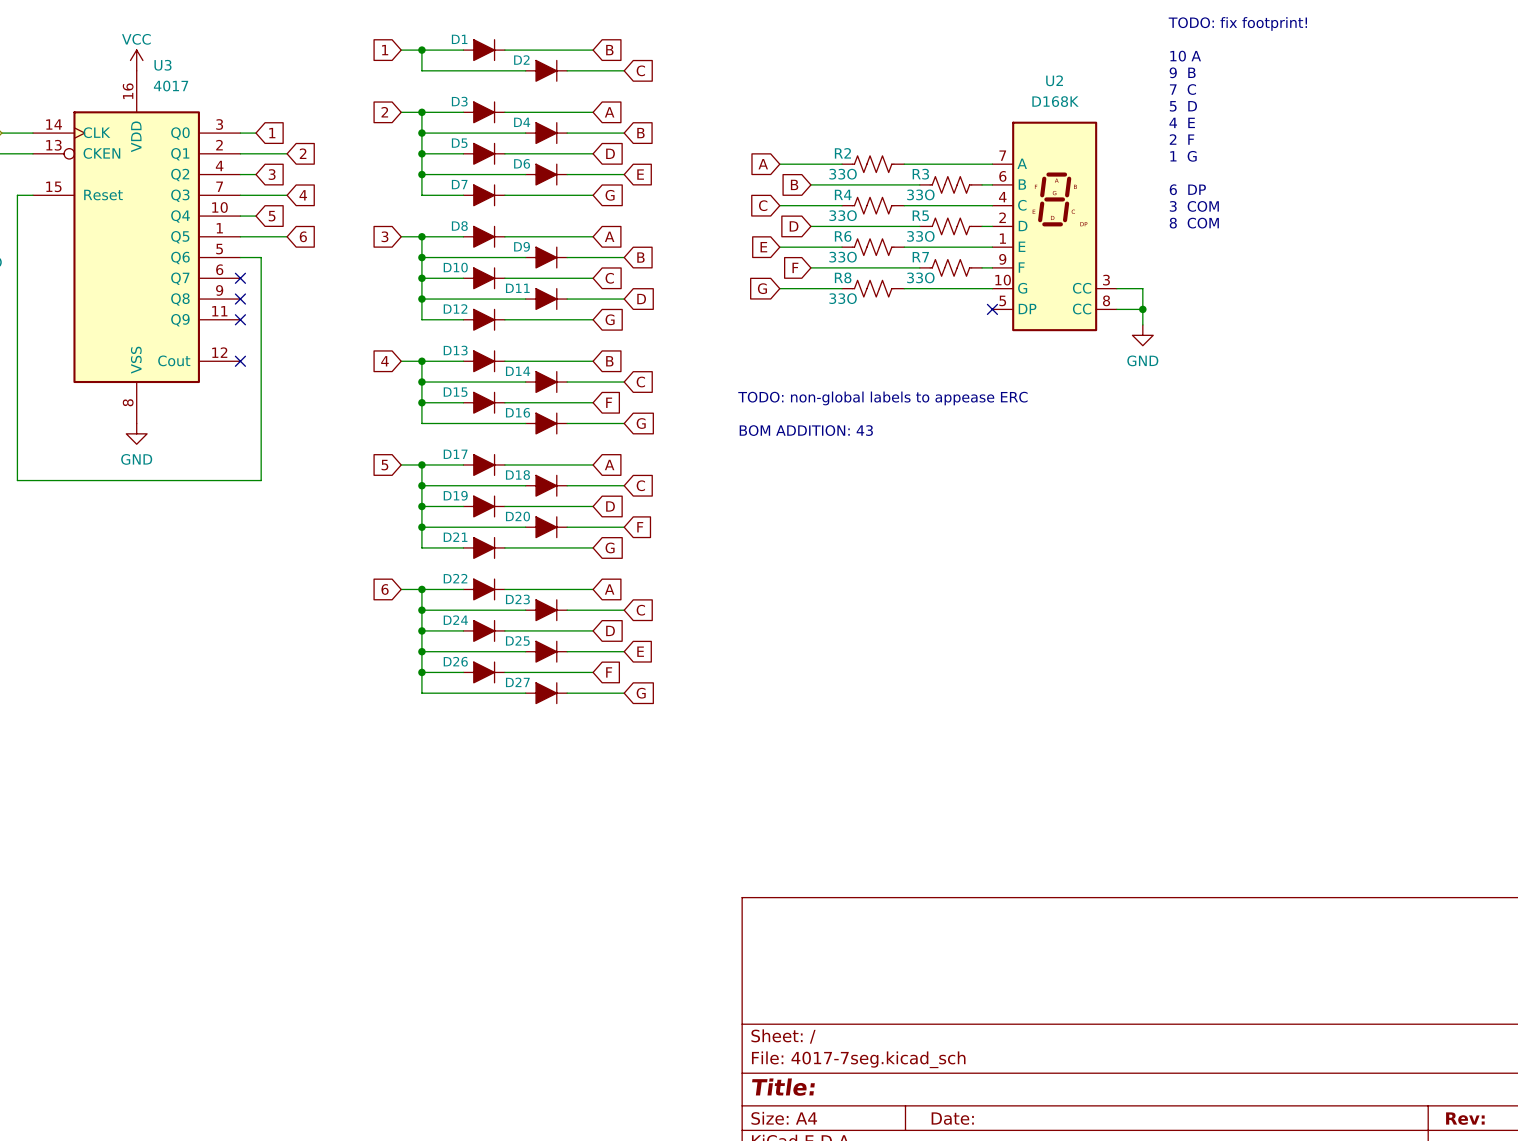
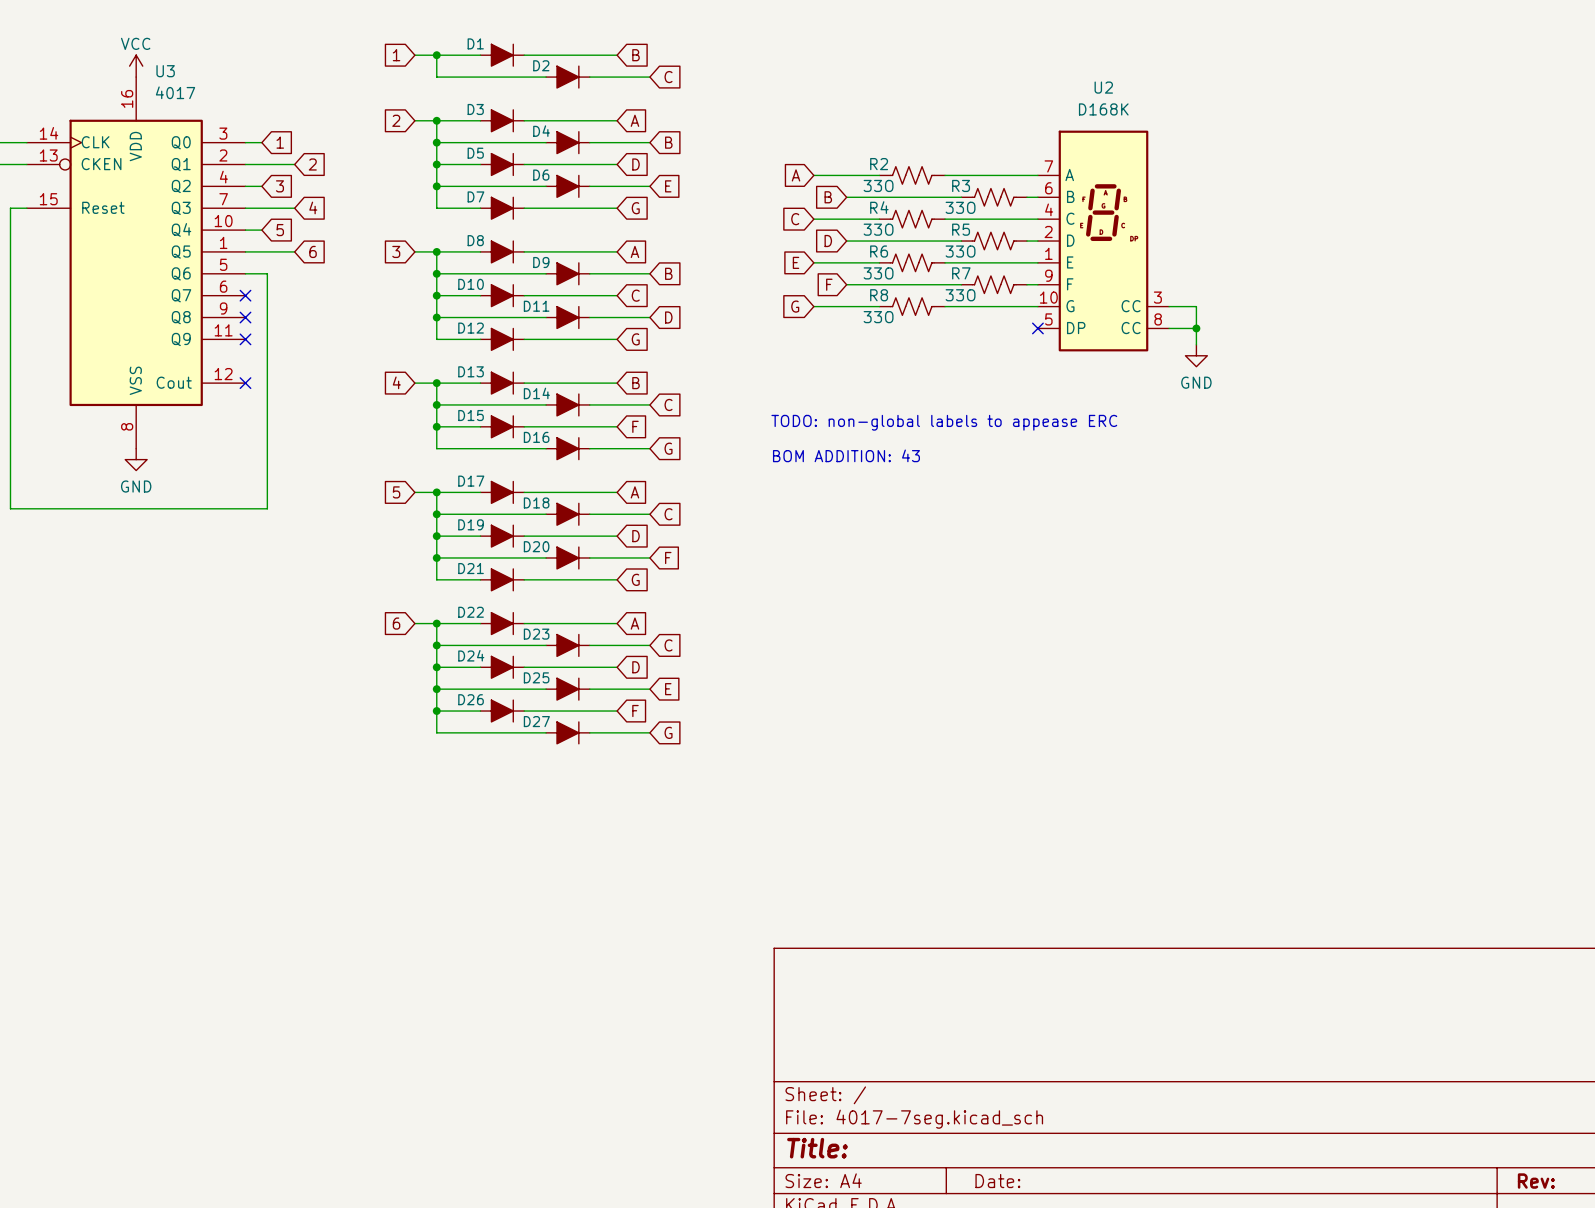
text: TODO: fix footprint! (1237, 23) -> none
text: 10 A (1185, 56) -> none
text: 9 B (1182, 72) -> none
text: 7 C (1182, 89) -> none
text: 5 D (1183, 106) -> none
text: 4 E (1182, 122) -> none
text: 2 F (1182, 139) -> none
text: 1 G (1183, 156) -> none
text: 6 DP (1187, 189) -> none
text: 3 COM (1194, 206) -> none
text: 8 COM (1194, 223) -> none

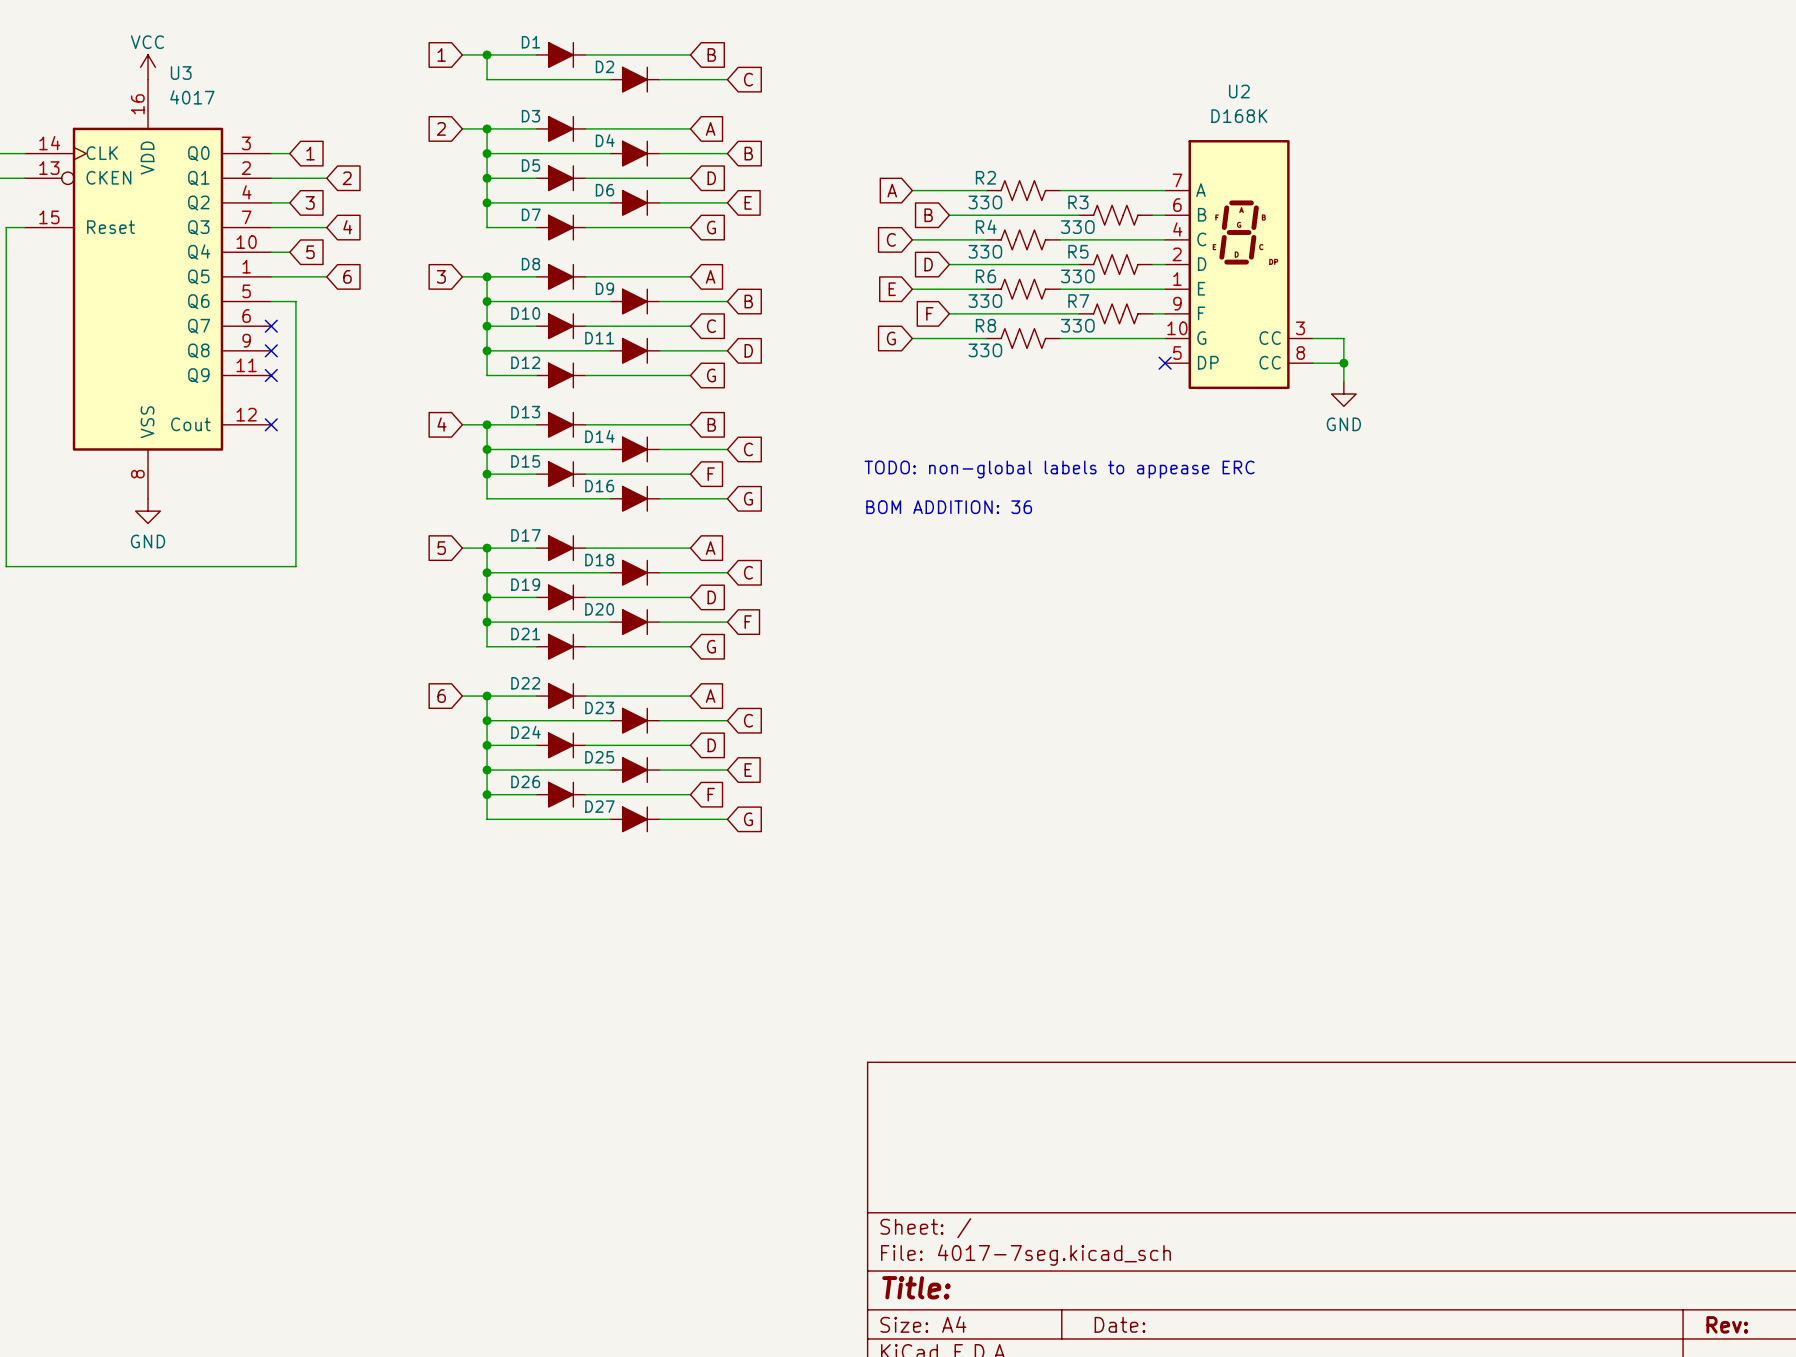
text: BOM ADDITION: 43 (846, 455) -> BOM ADDITION: 36 (949, 507)

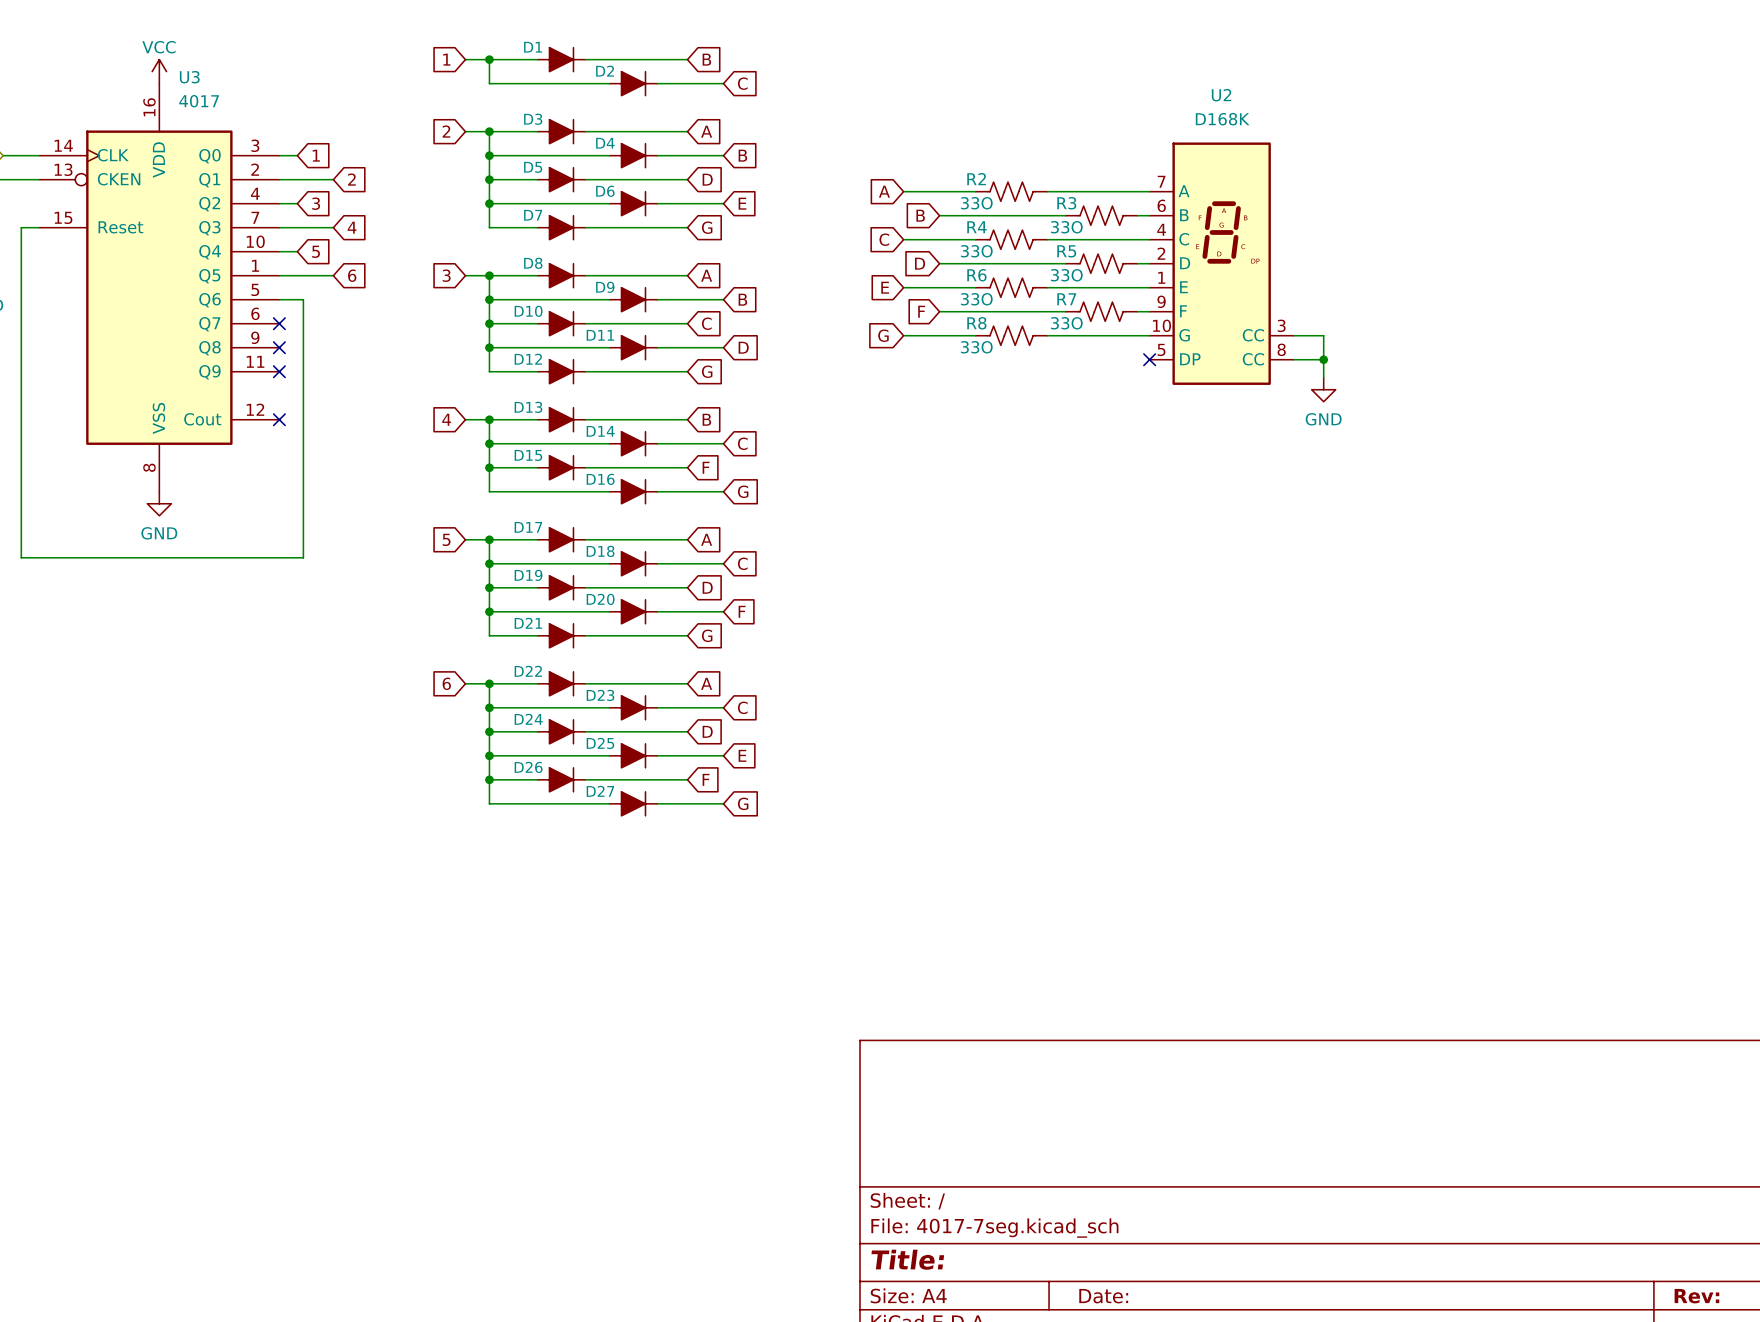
text: TODO: non-global labels to appease ERC (1059, 469) -> none
text: BOM ADDITION: 36 (949, 507) -> none

